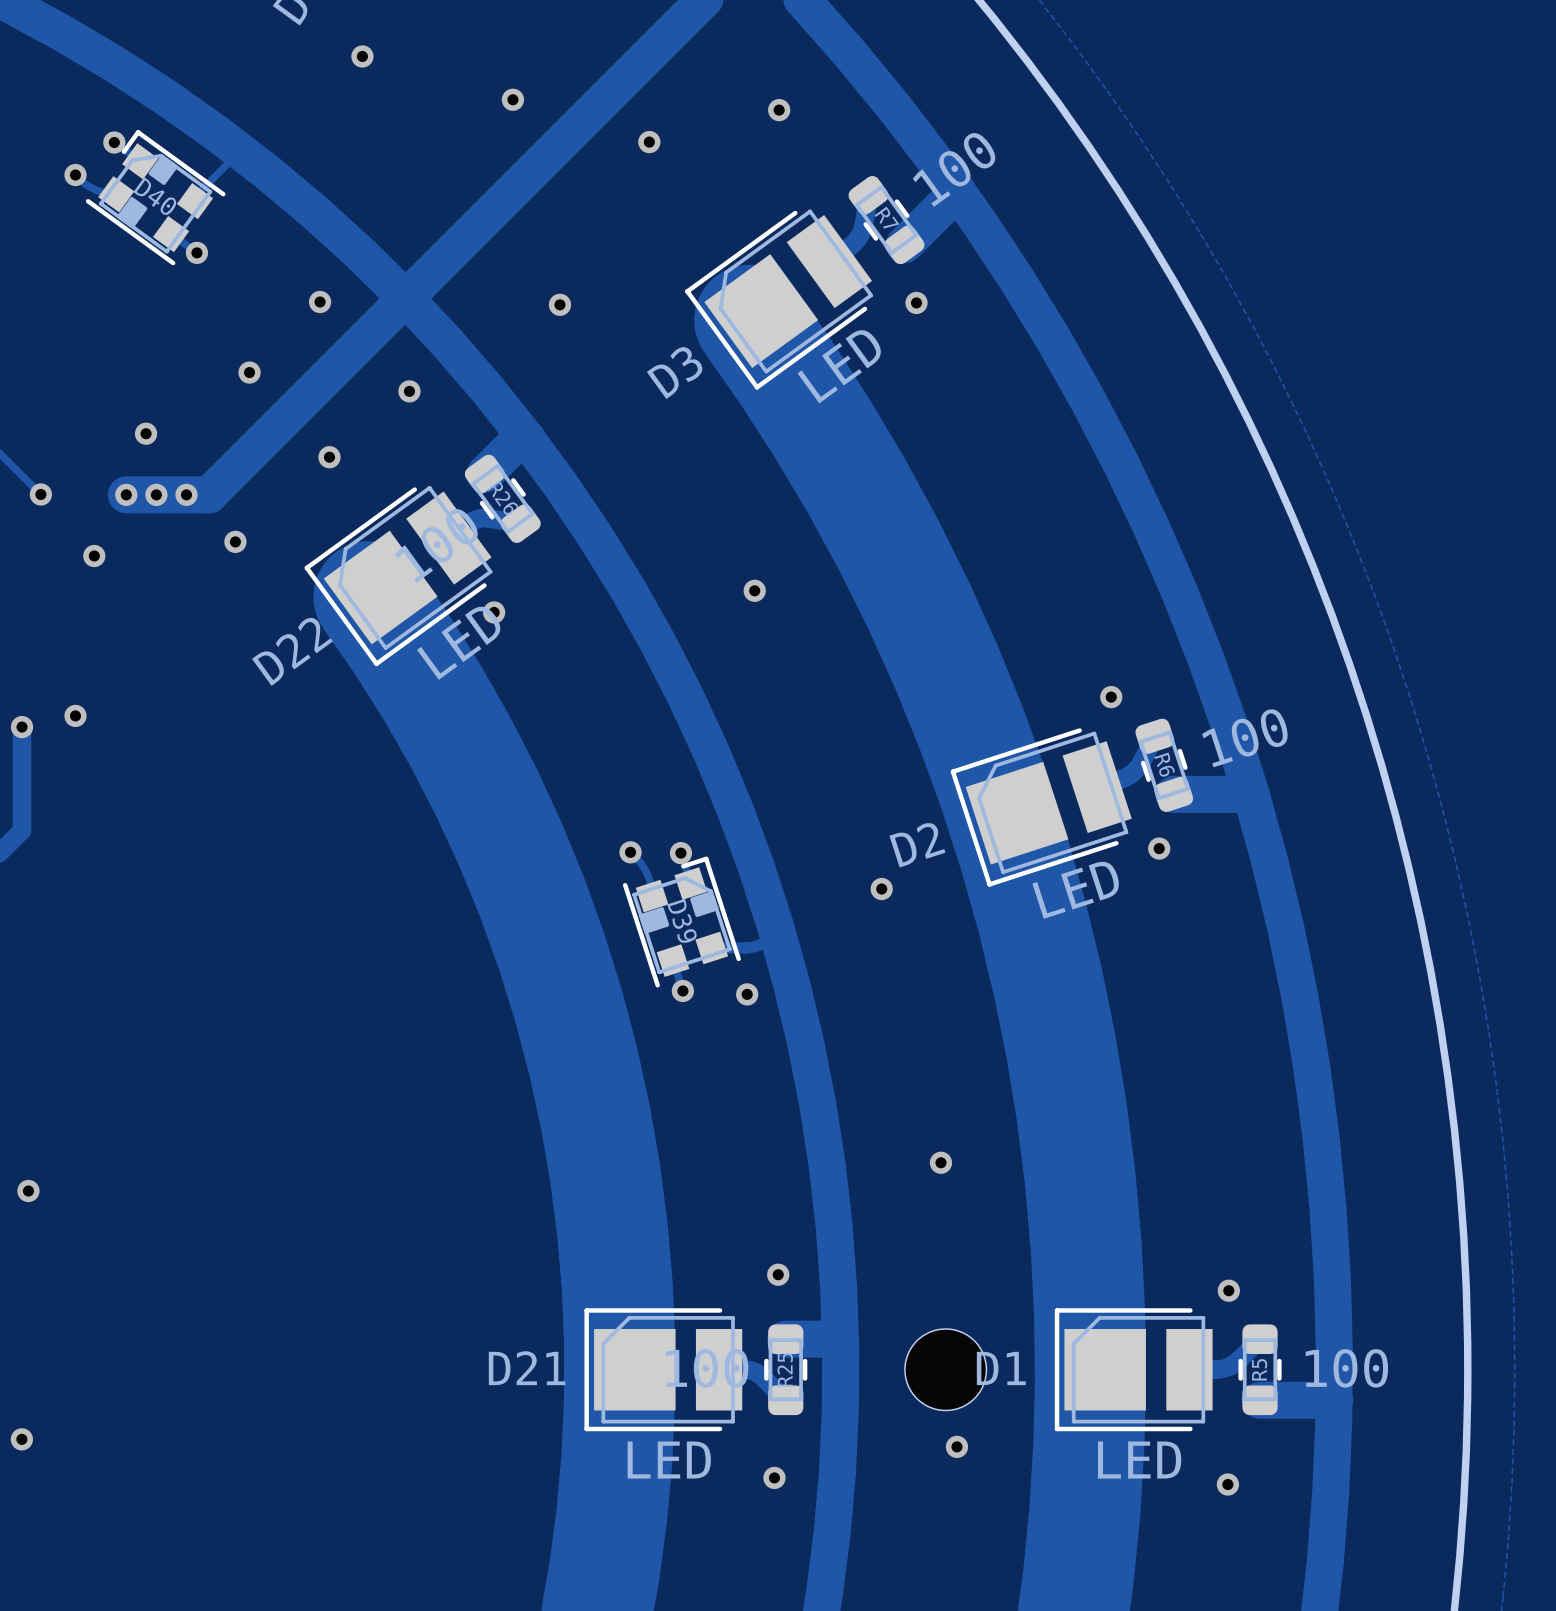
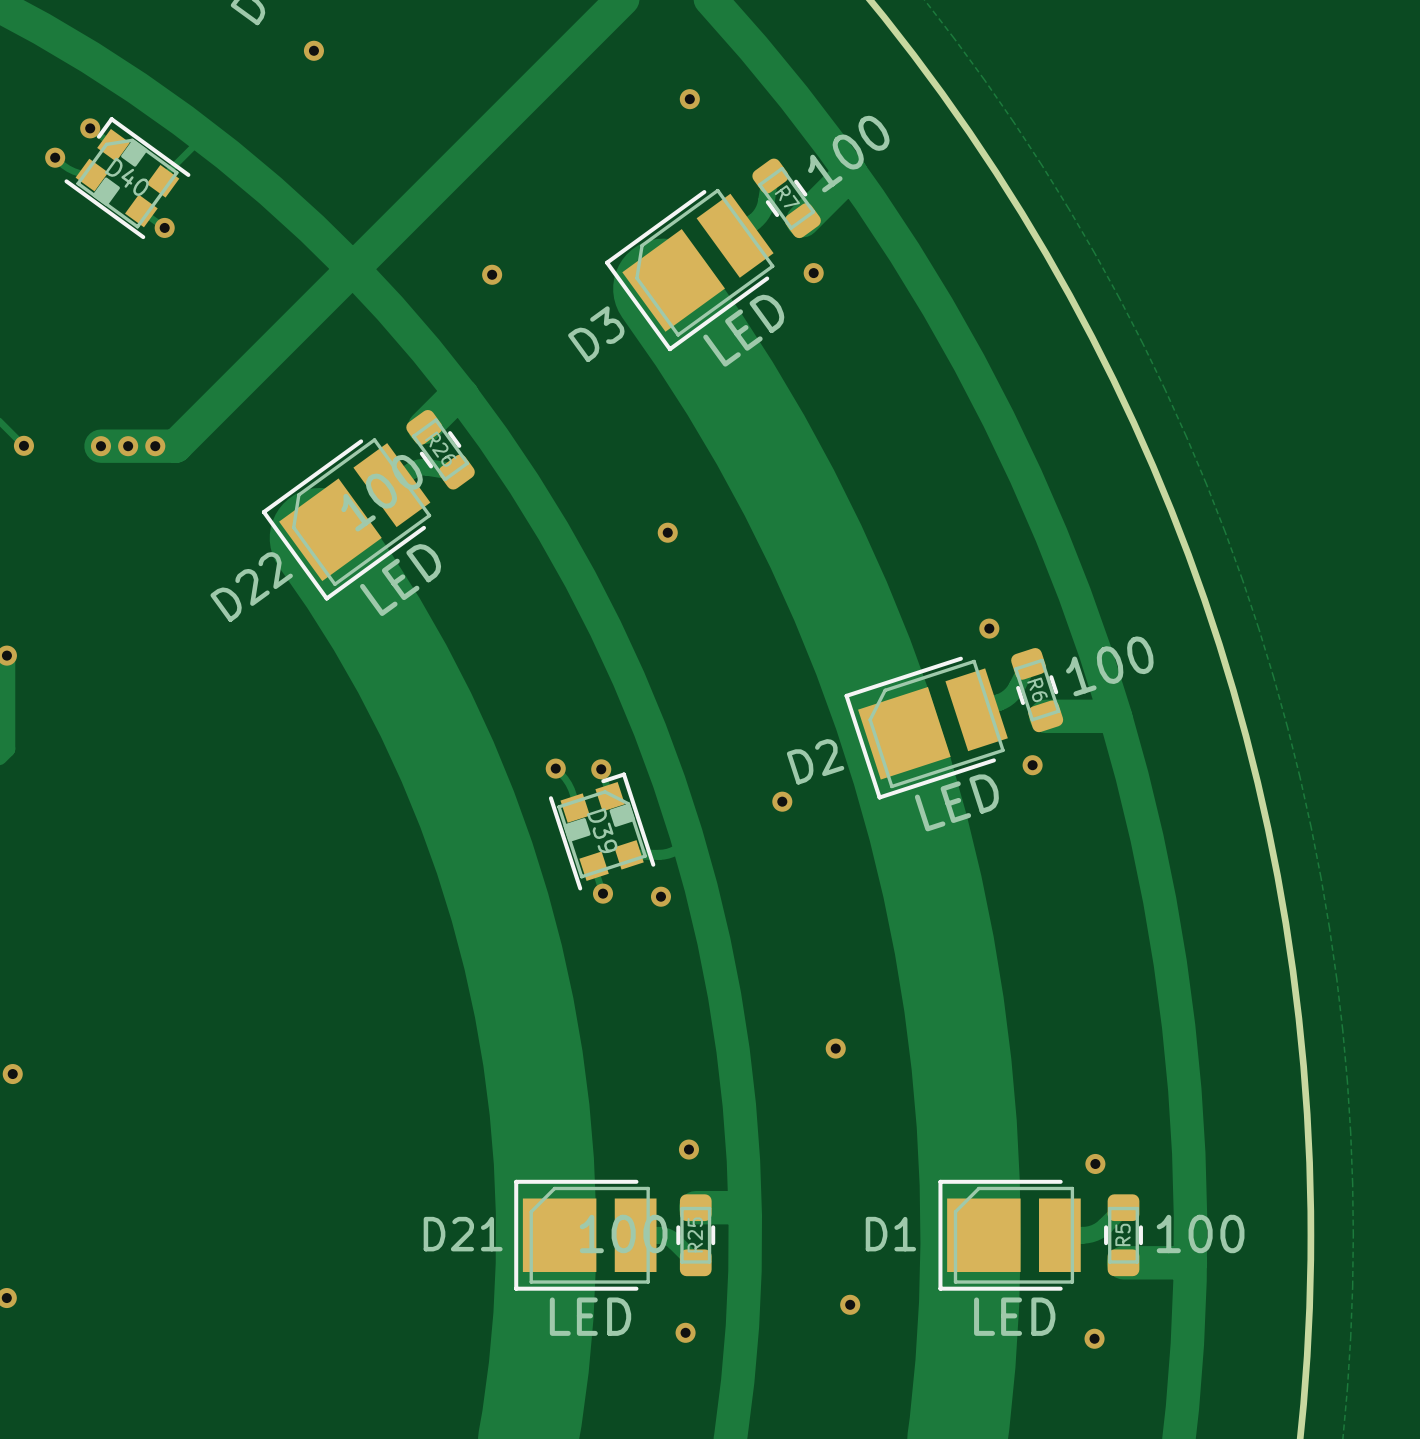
via: (512, 99) -> none
via: (649, 142) -> none
via: (320, 302) -> none
via: (249, 372) -> none
via: (409, 391) -> none
via: (146, 433) -> none
via: (329, 457) -> none
via: (235, 541) -> none
via: (94, 556) -> none
via: (494, 612) -> none
via: (75, 715) -> none
part: (945, 1369) -> none

